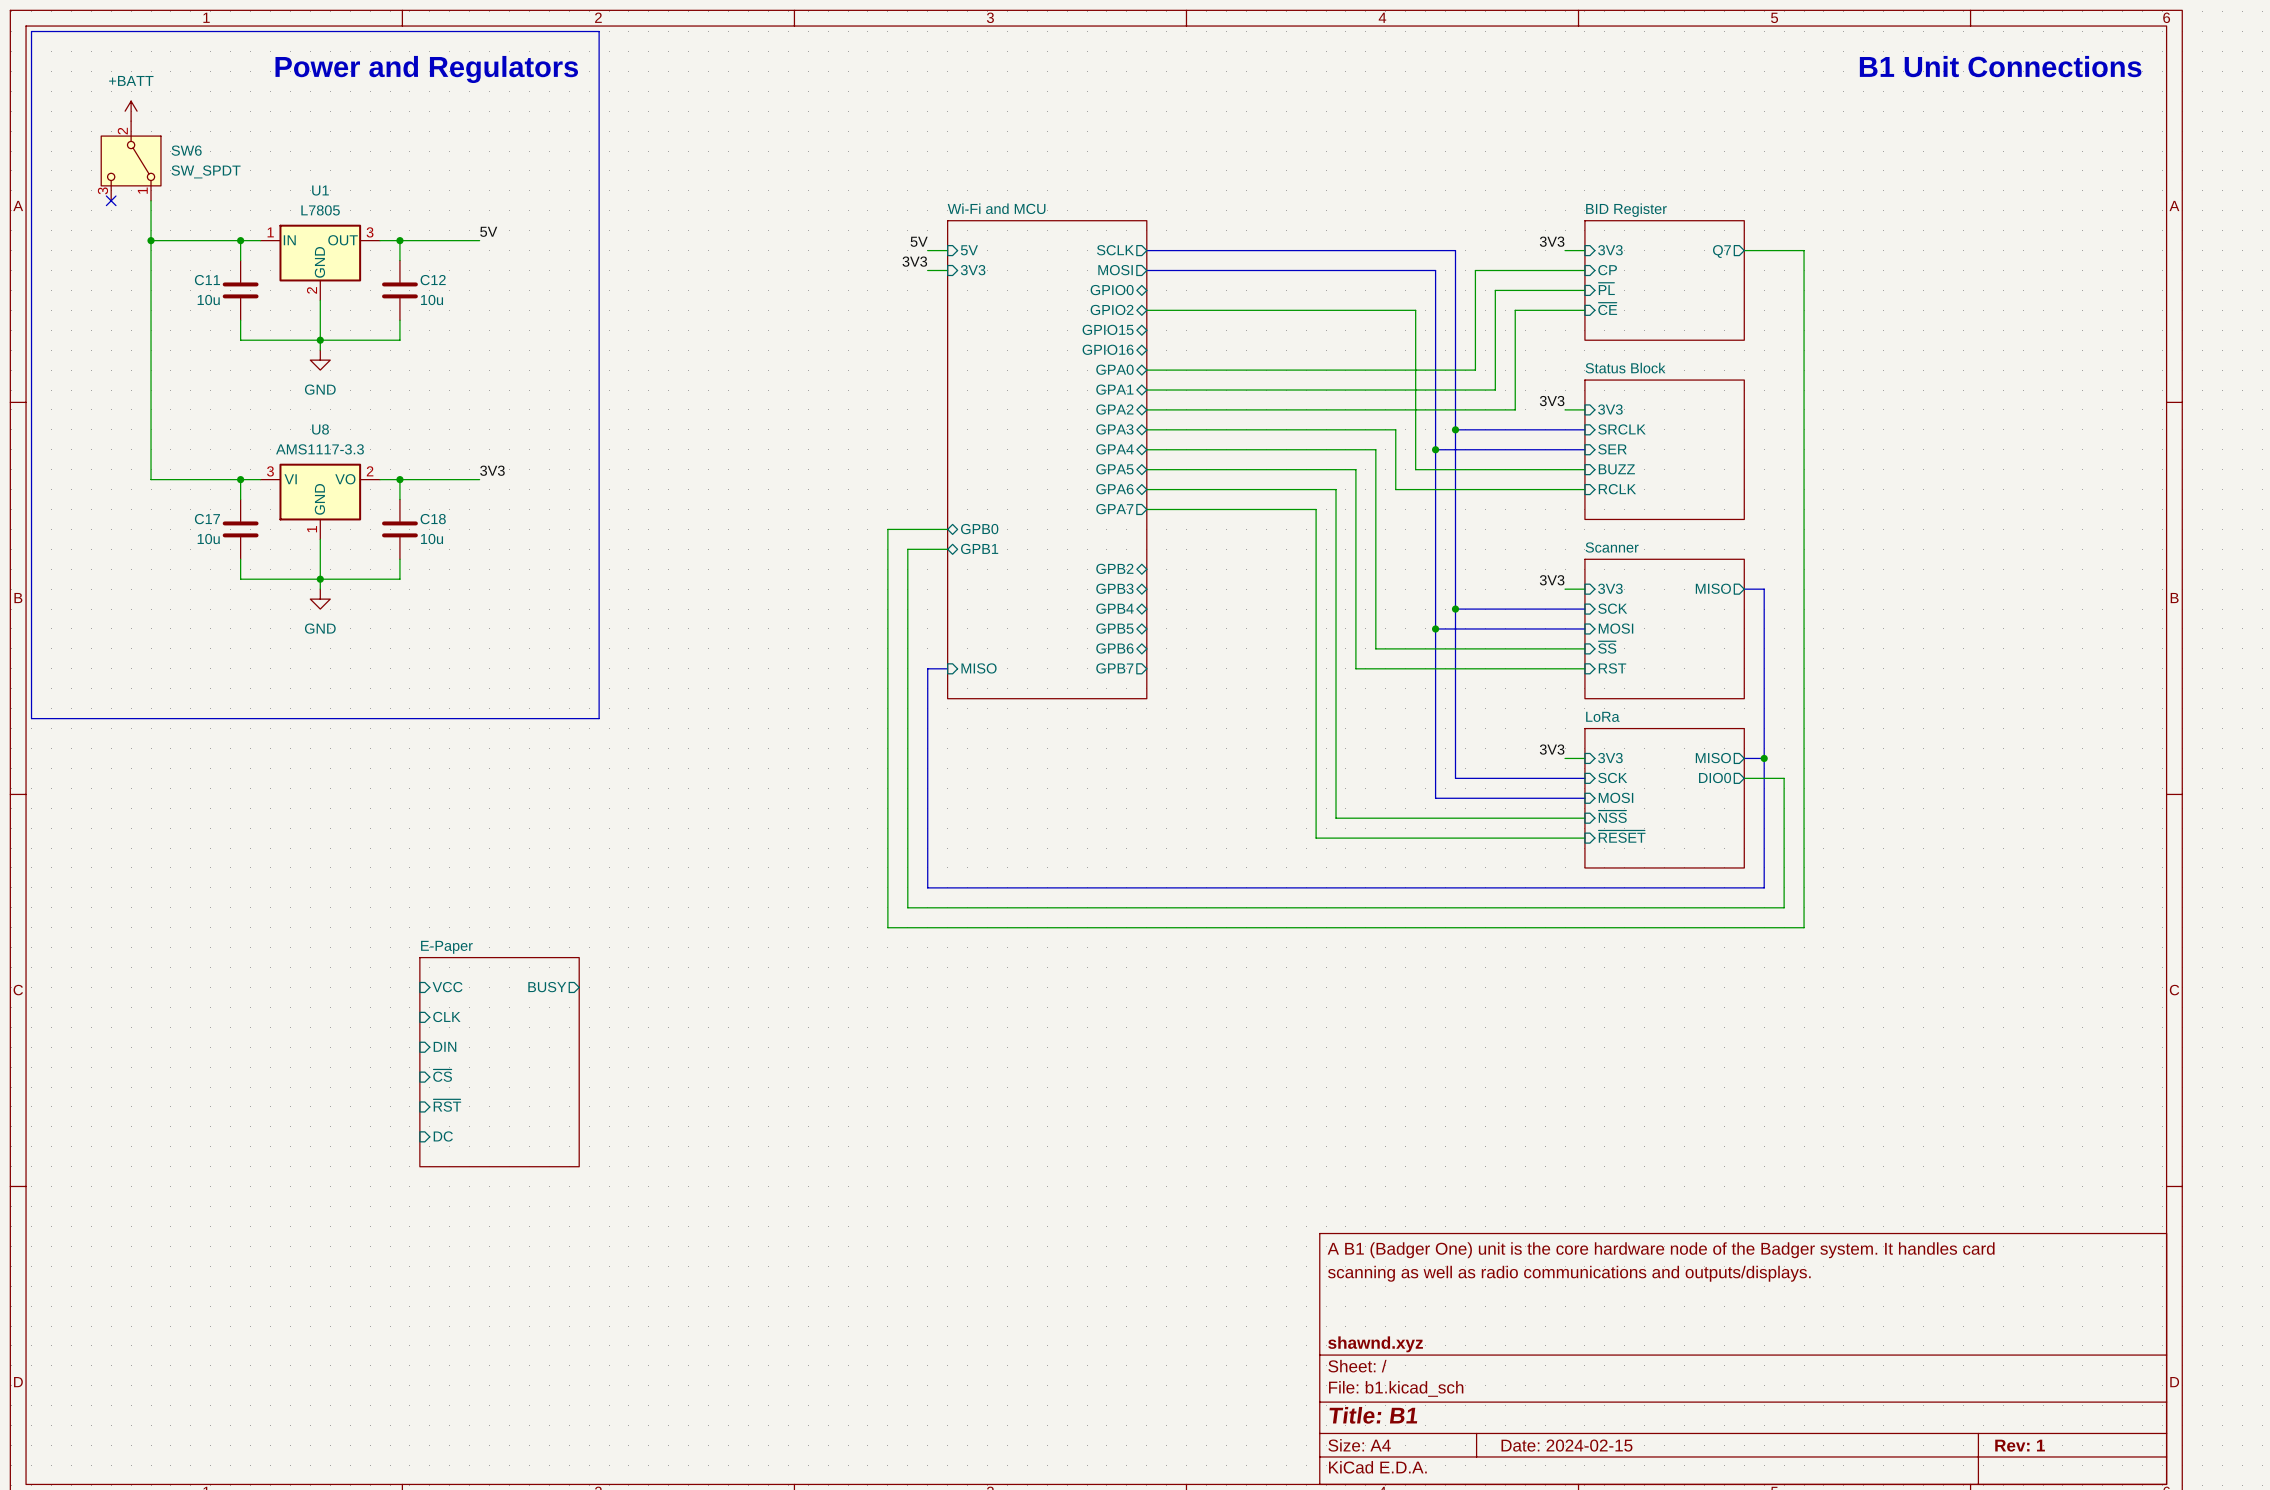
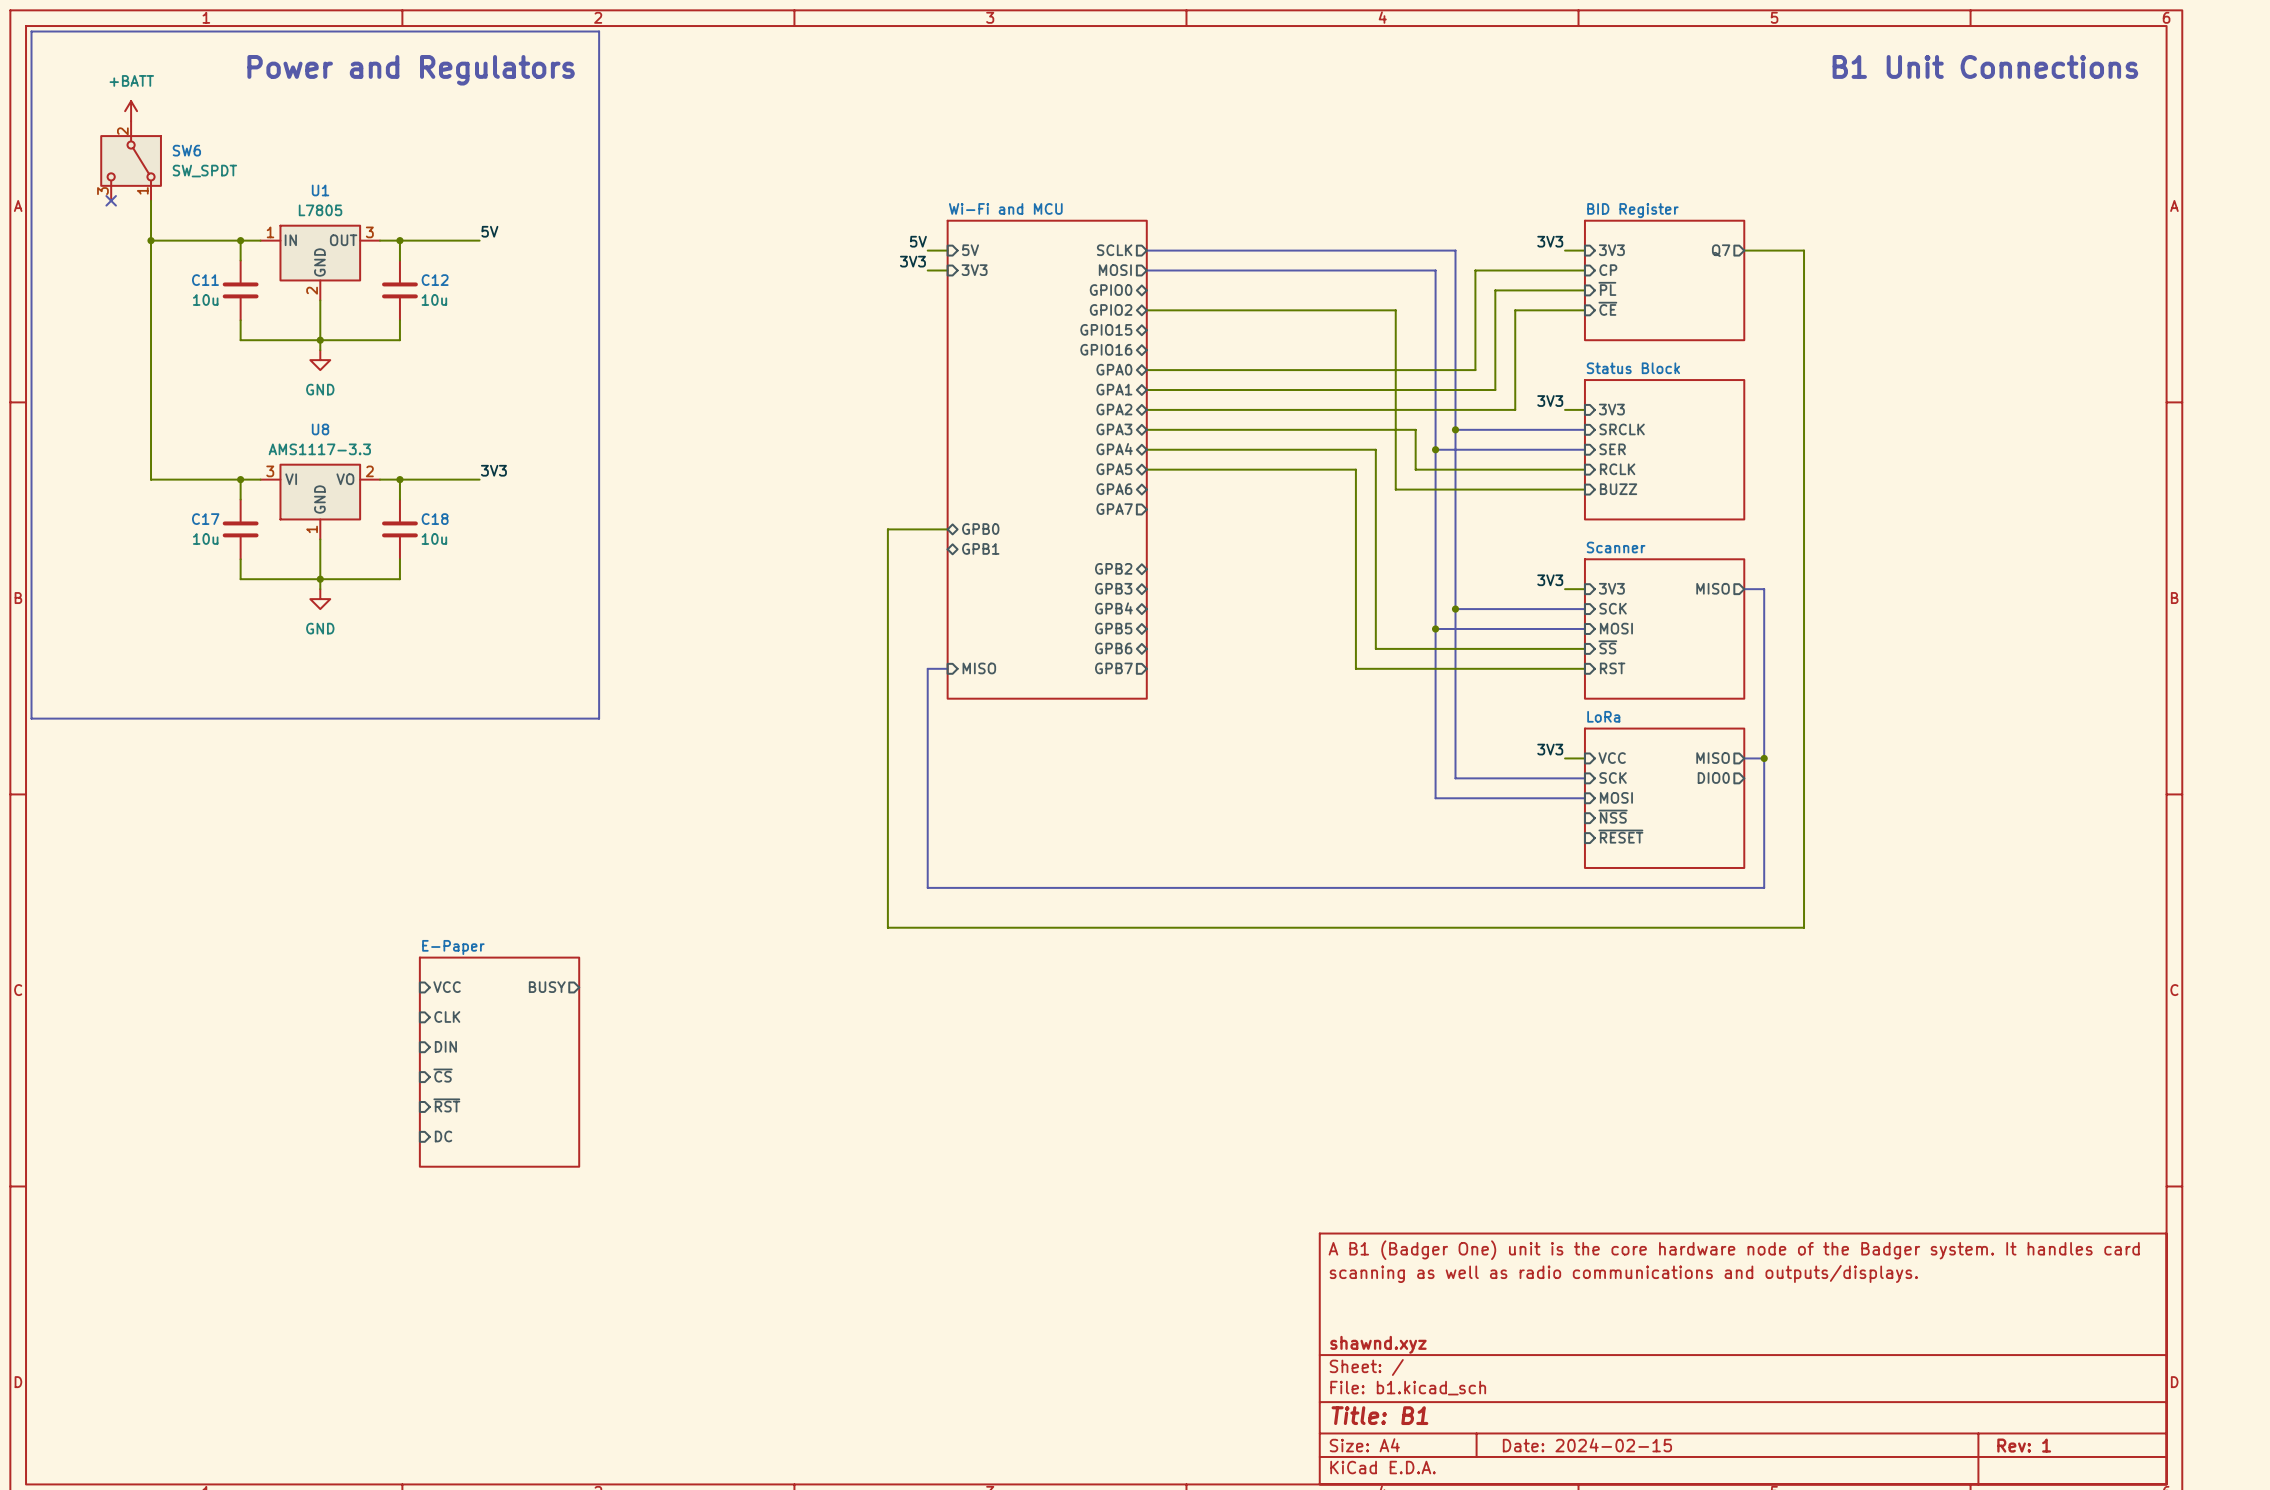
wire: (1395, 310) (1415, 310) (1415, 429) -> (1395, 310) (1395, 429) (1415, 429)
sheet pin: BUZZ (1616, 469) -> RCLK (1617, 469)
wire: (1146, 489) (1336, 489) (1336, 818) (1584, 818) -> none
sheet pin: RCLK (1617, 489) -> BUZZ (1618, 489)
wire: (1146, 509) (1316, 509) (1316, 838) (1584, 838) -> none
wire: (947, 549) (907, 549) (907, 907) (1784, 907) (1784, 778) (1744, 778) -> none
sheet pin: 3V3 (1610, 758) -> VCC (1612, 758)

